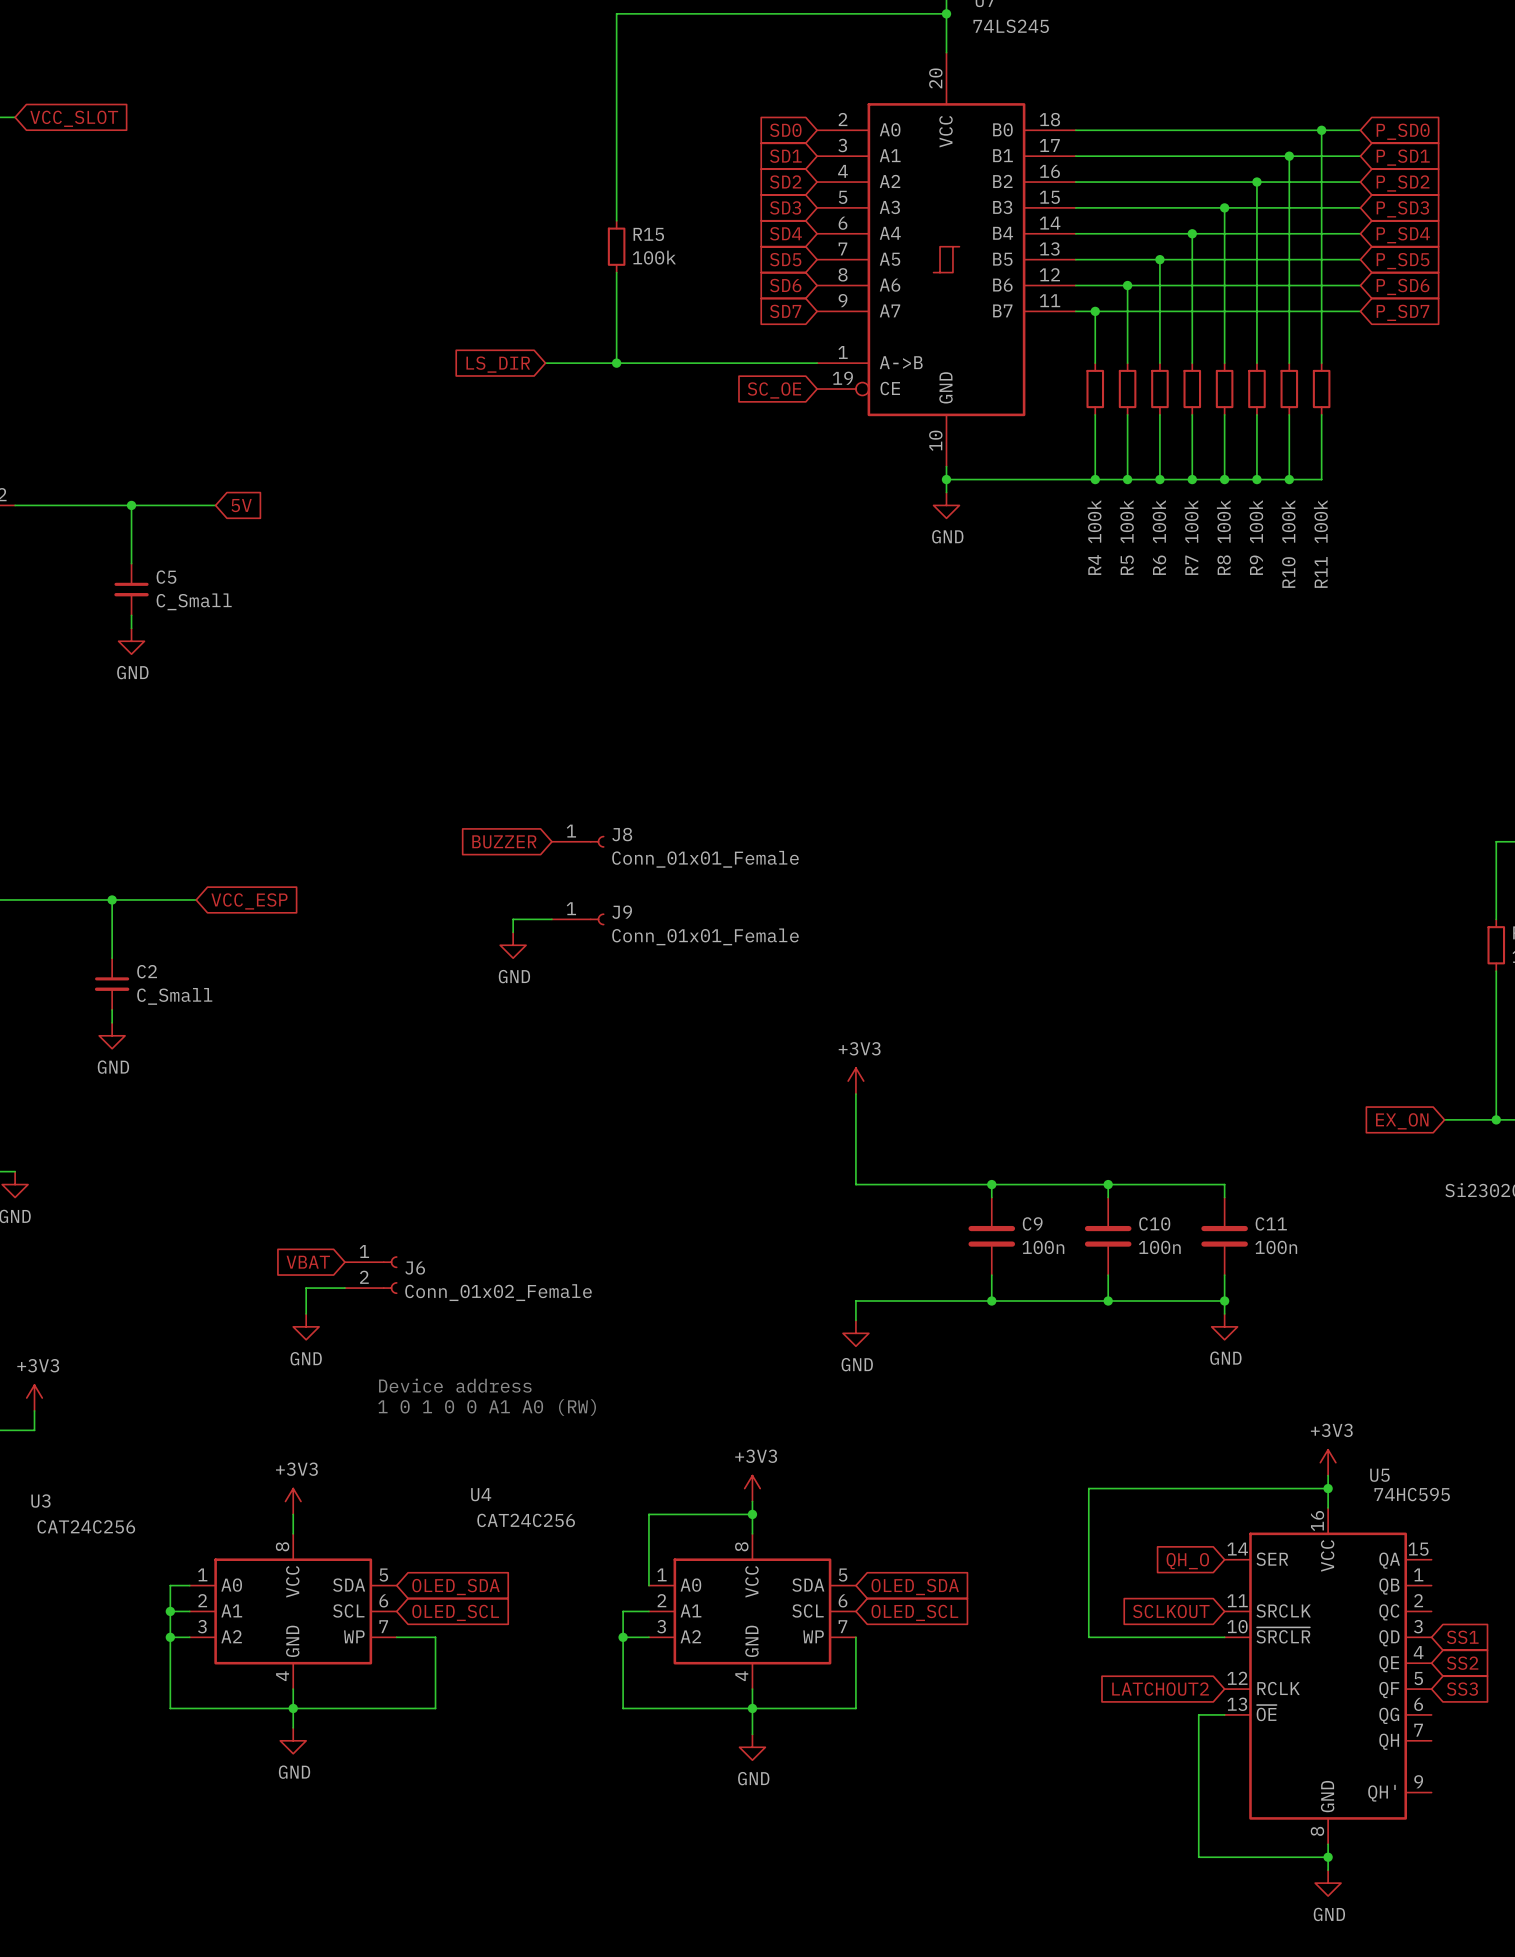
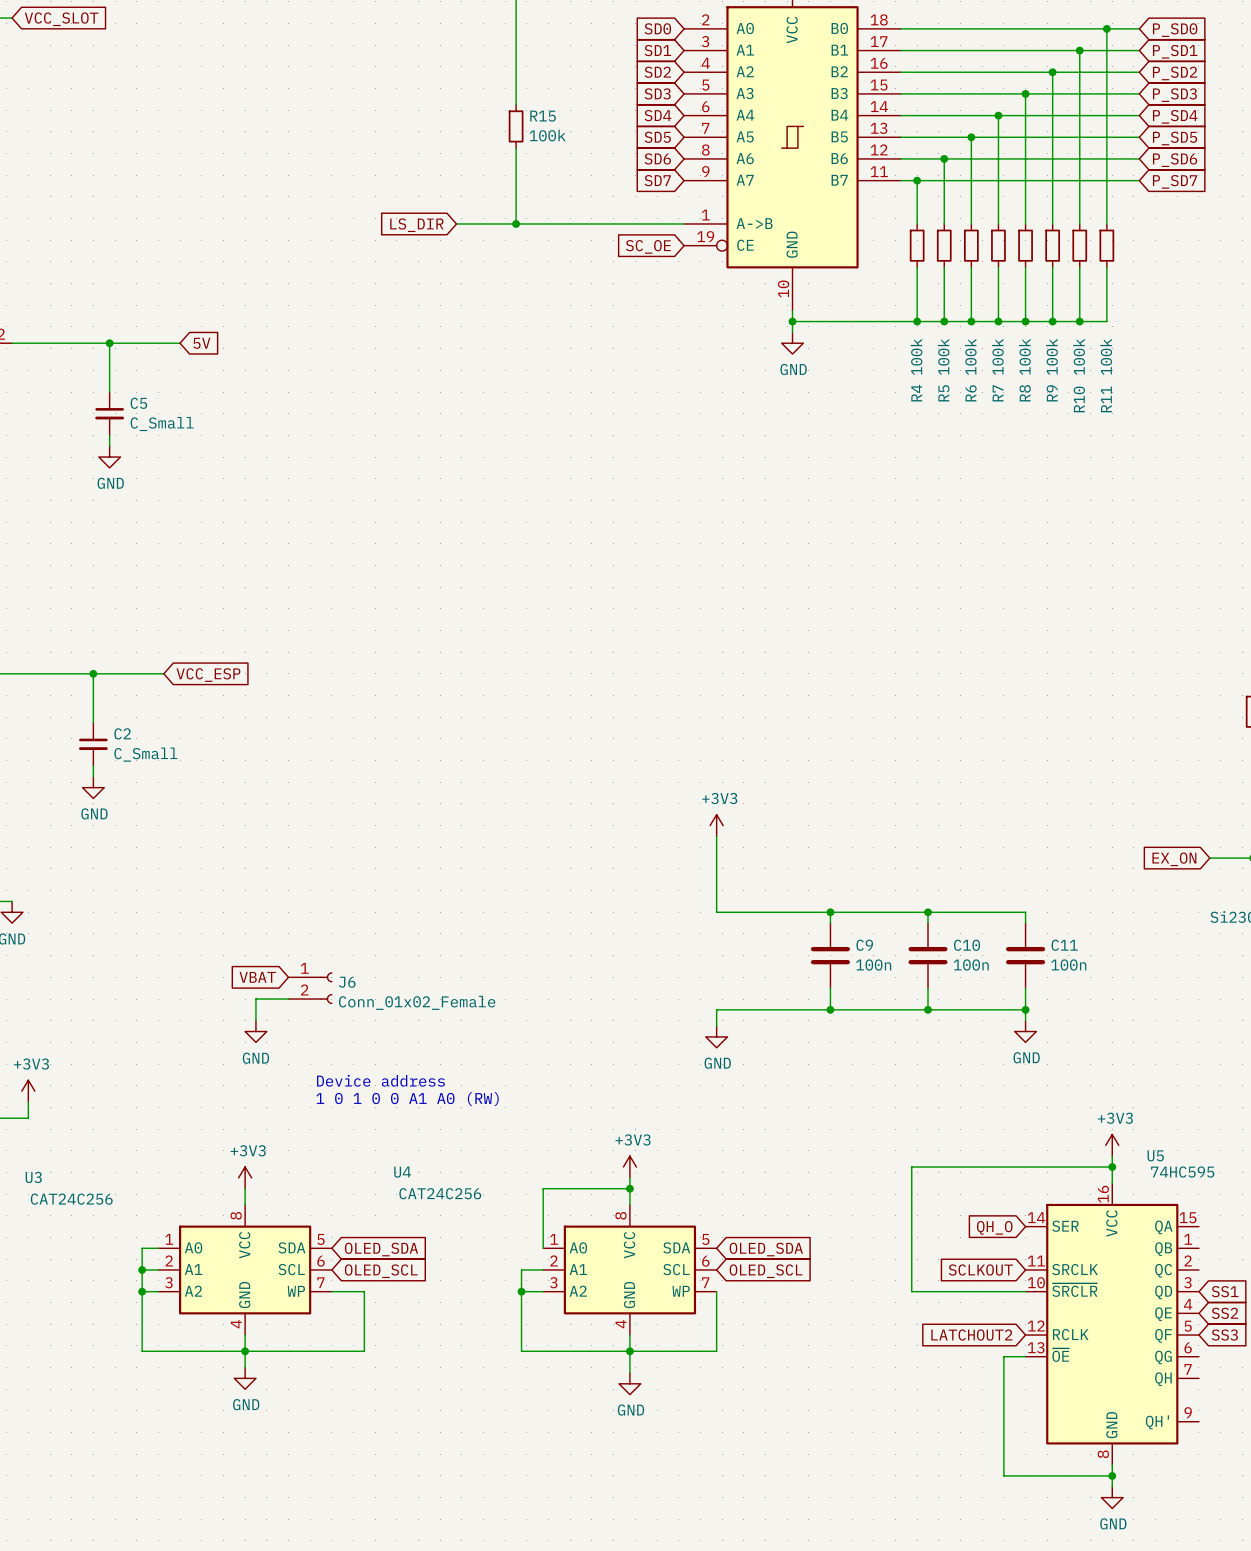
global label: BUZZER (504, 841) -> none
J8: Conn_01x01_Female (578, 841) -> none
wire: (551, 919) (513, 919) (513, 932) -> none
J9: Conn_01x01_Female (578, 919) -> none
power symbol: GND (513, 945) -> none

